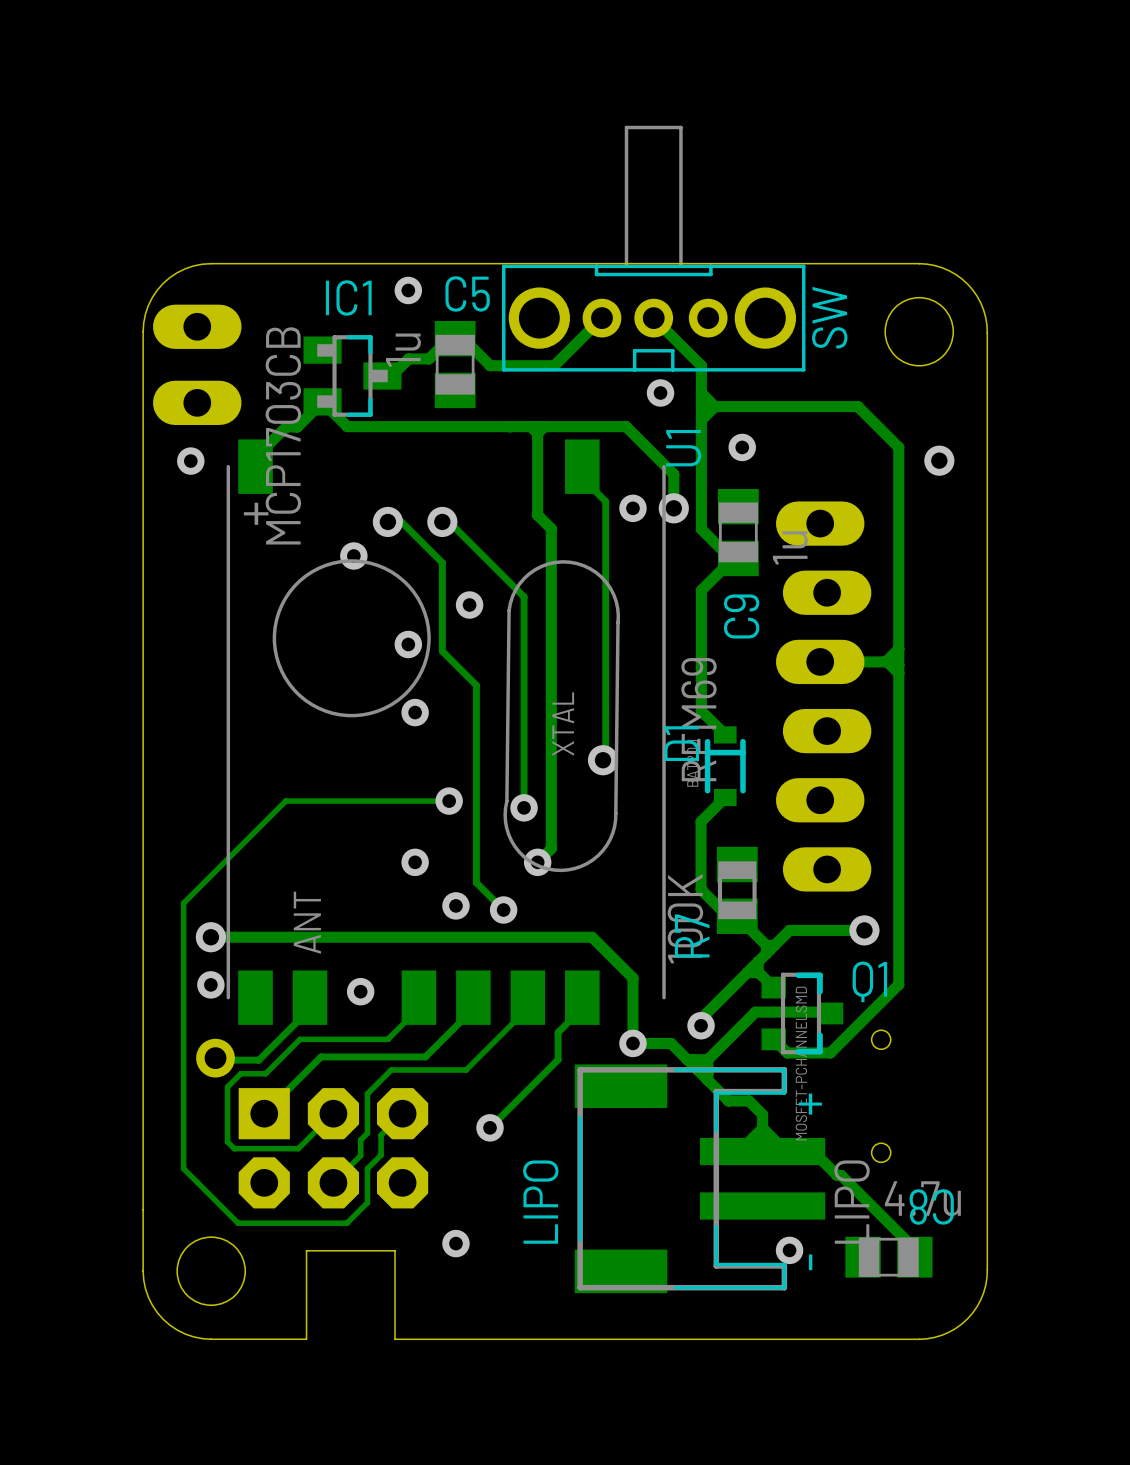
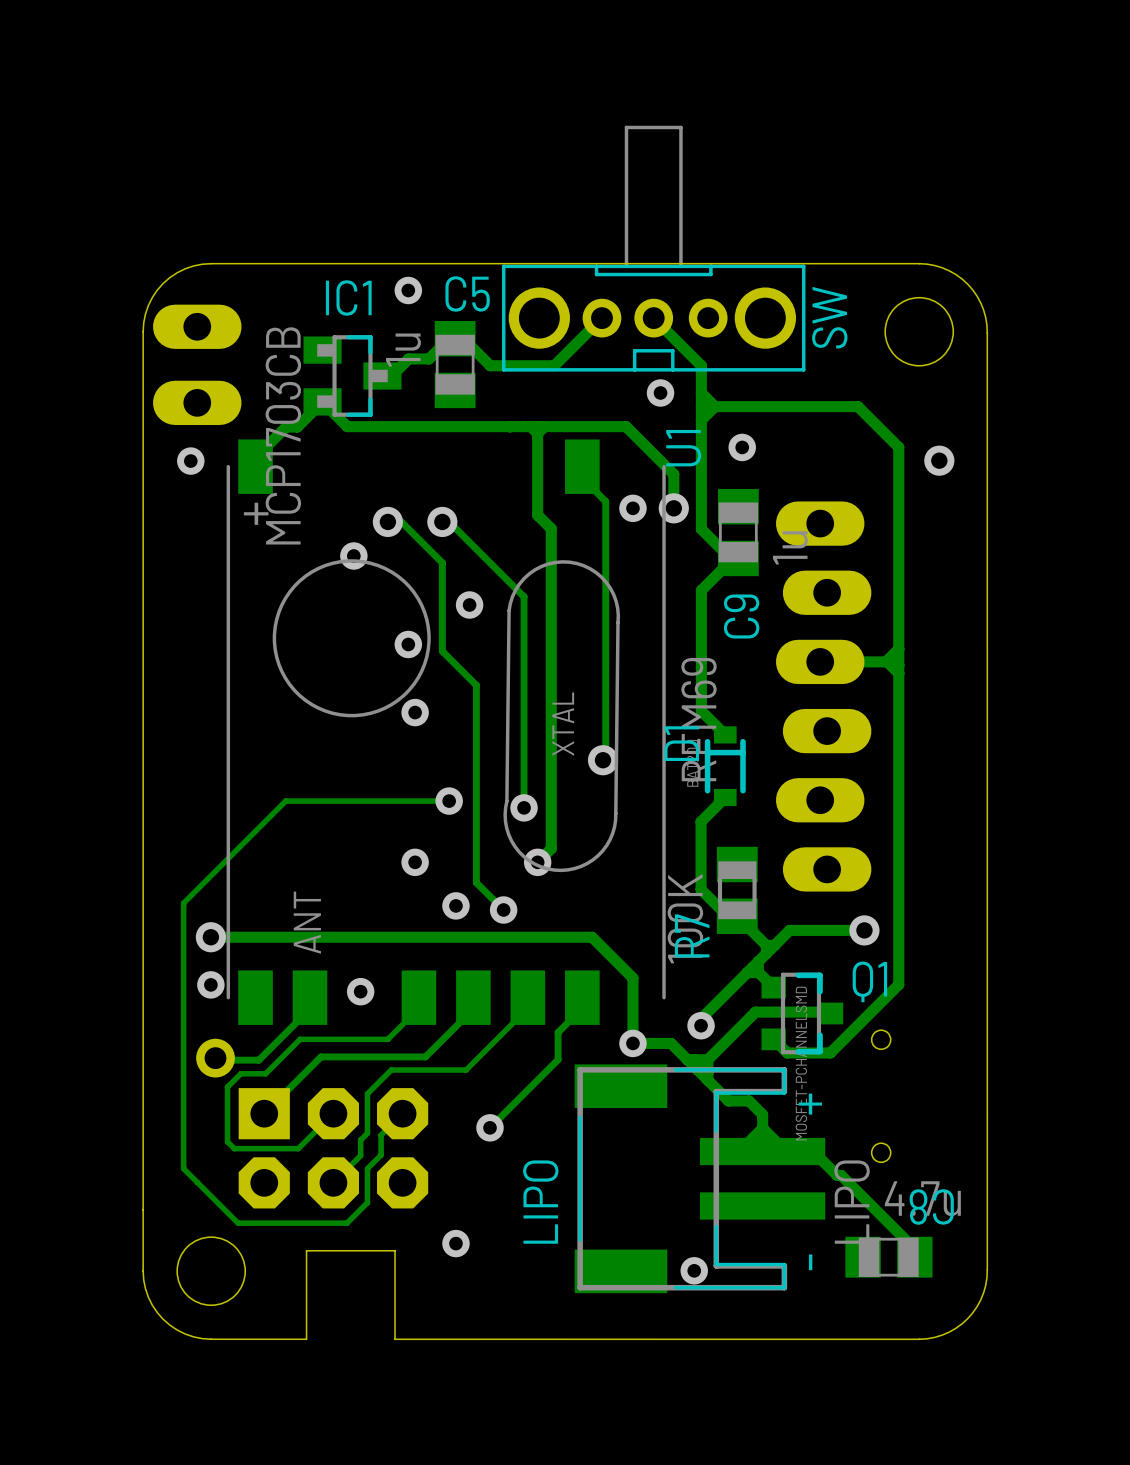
via position: (789, 1250) -> (694, 1270)

